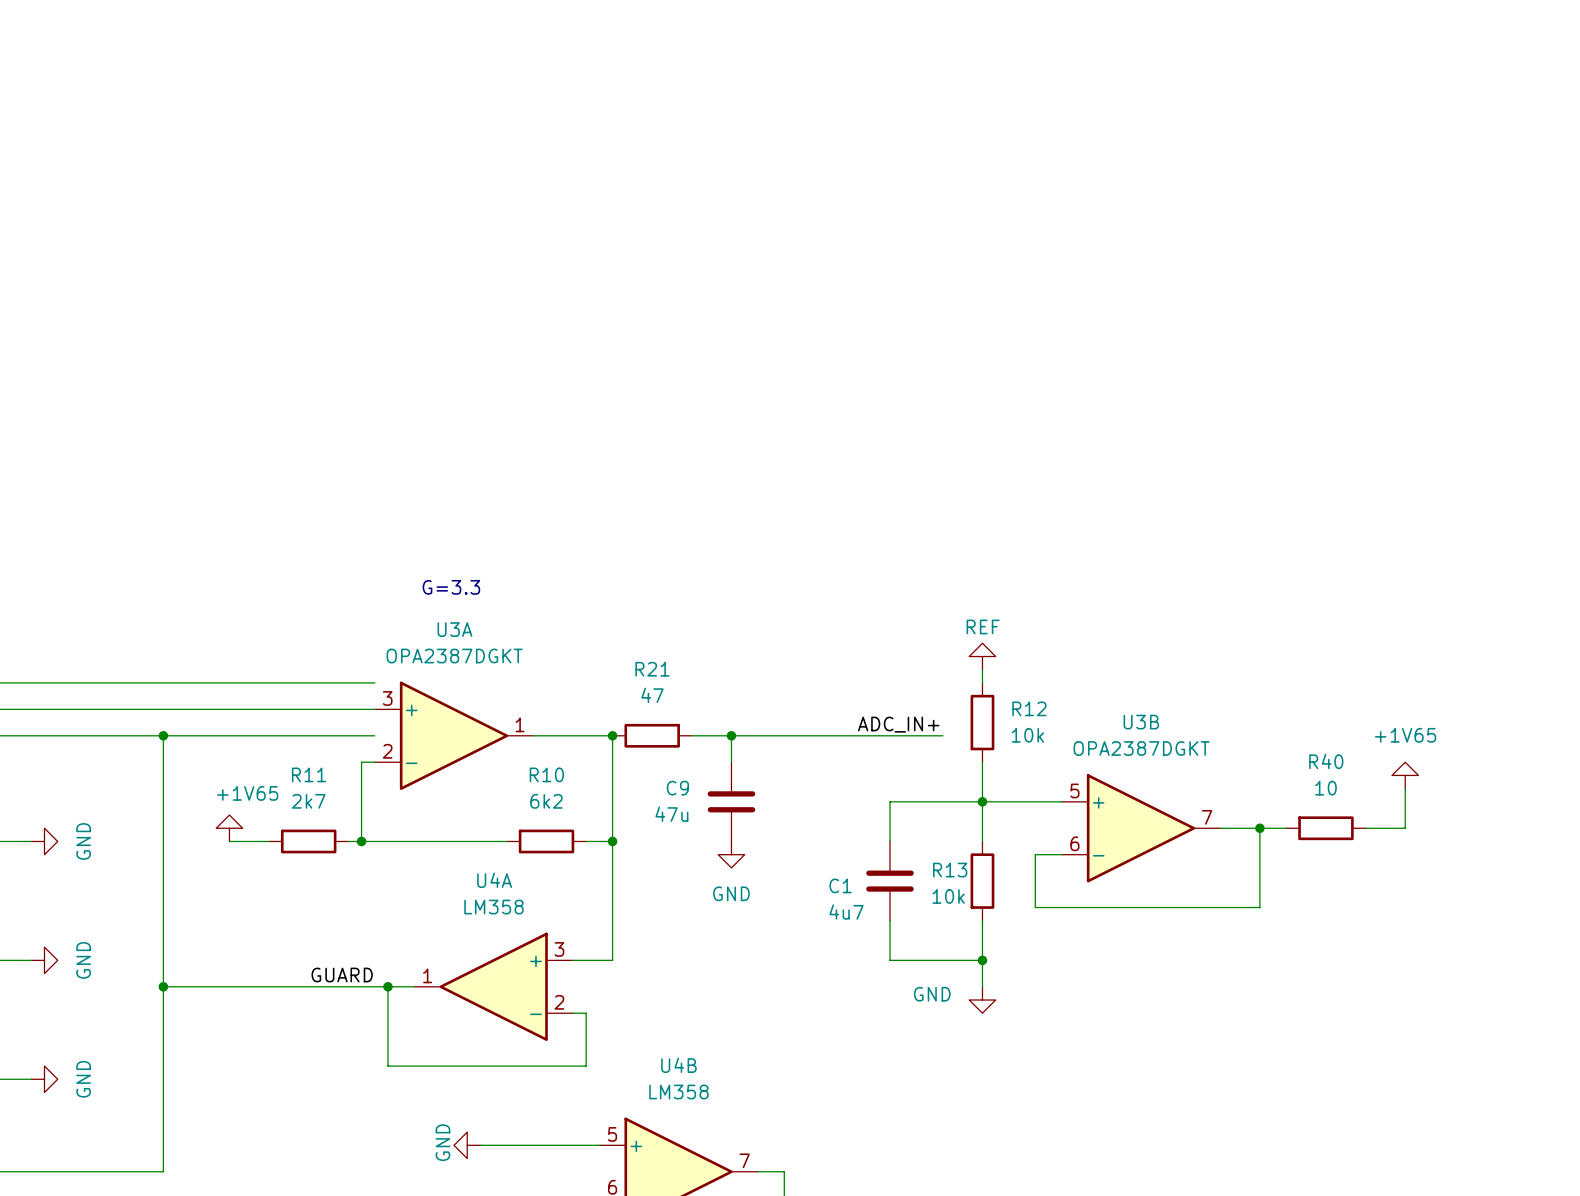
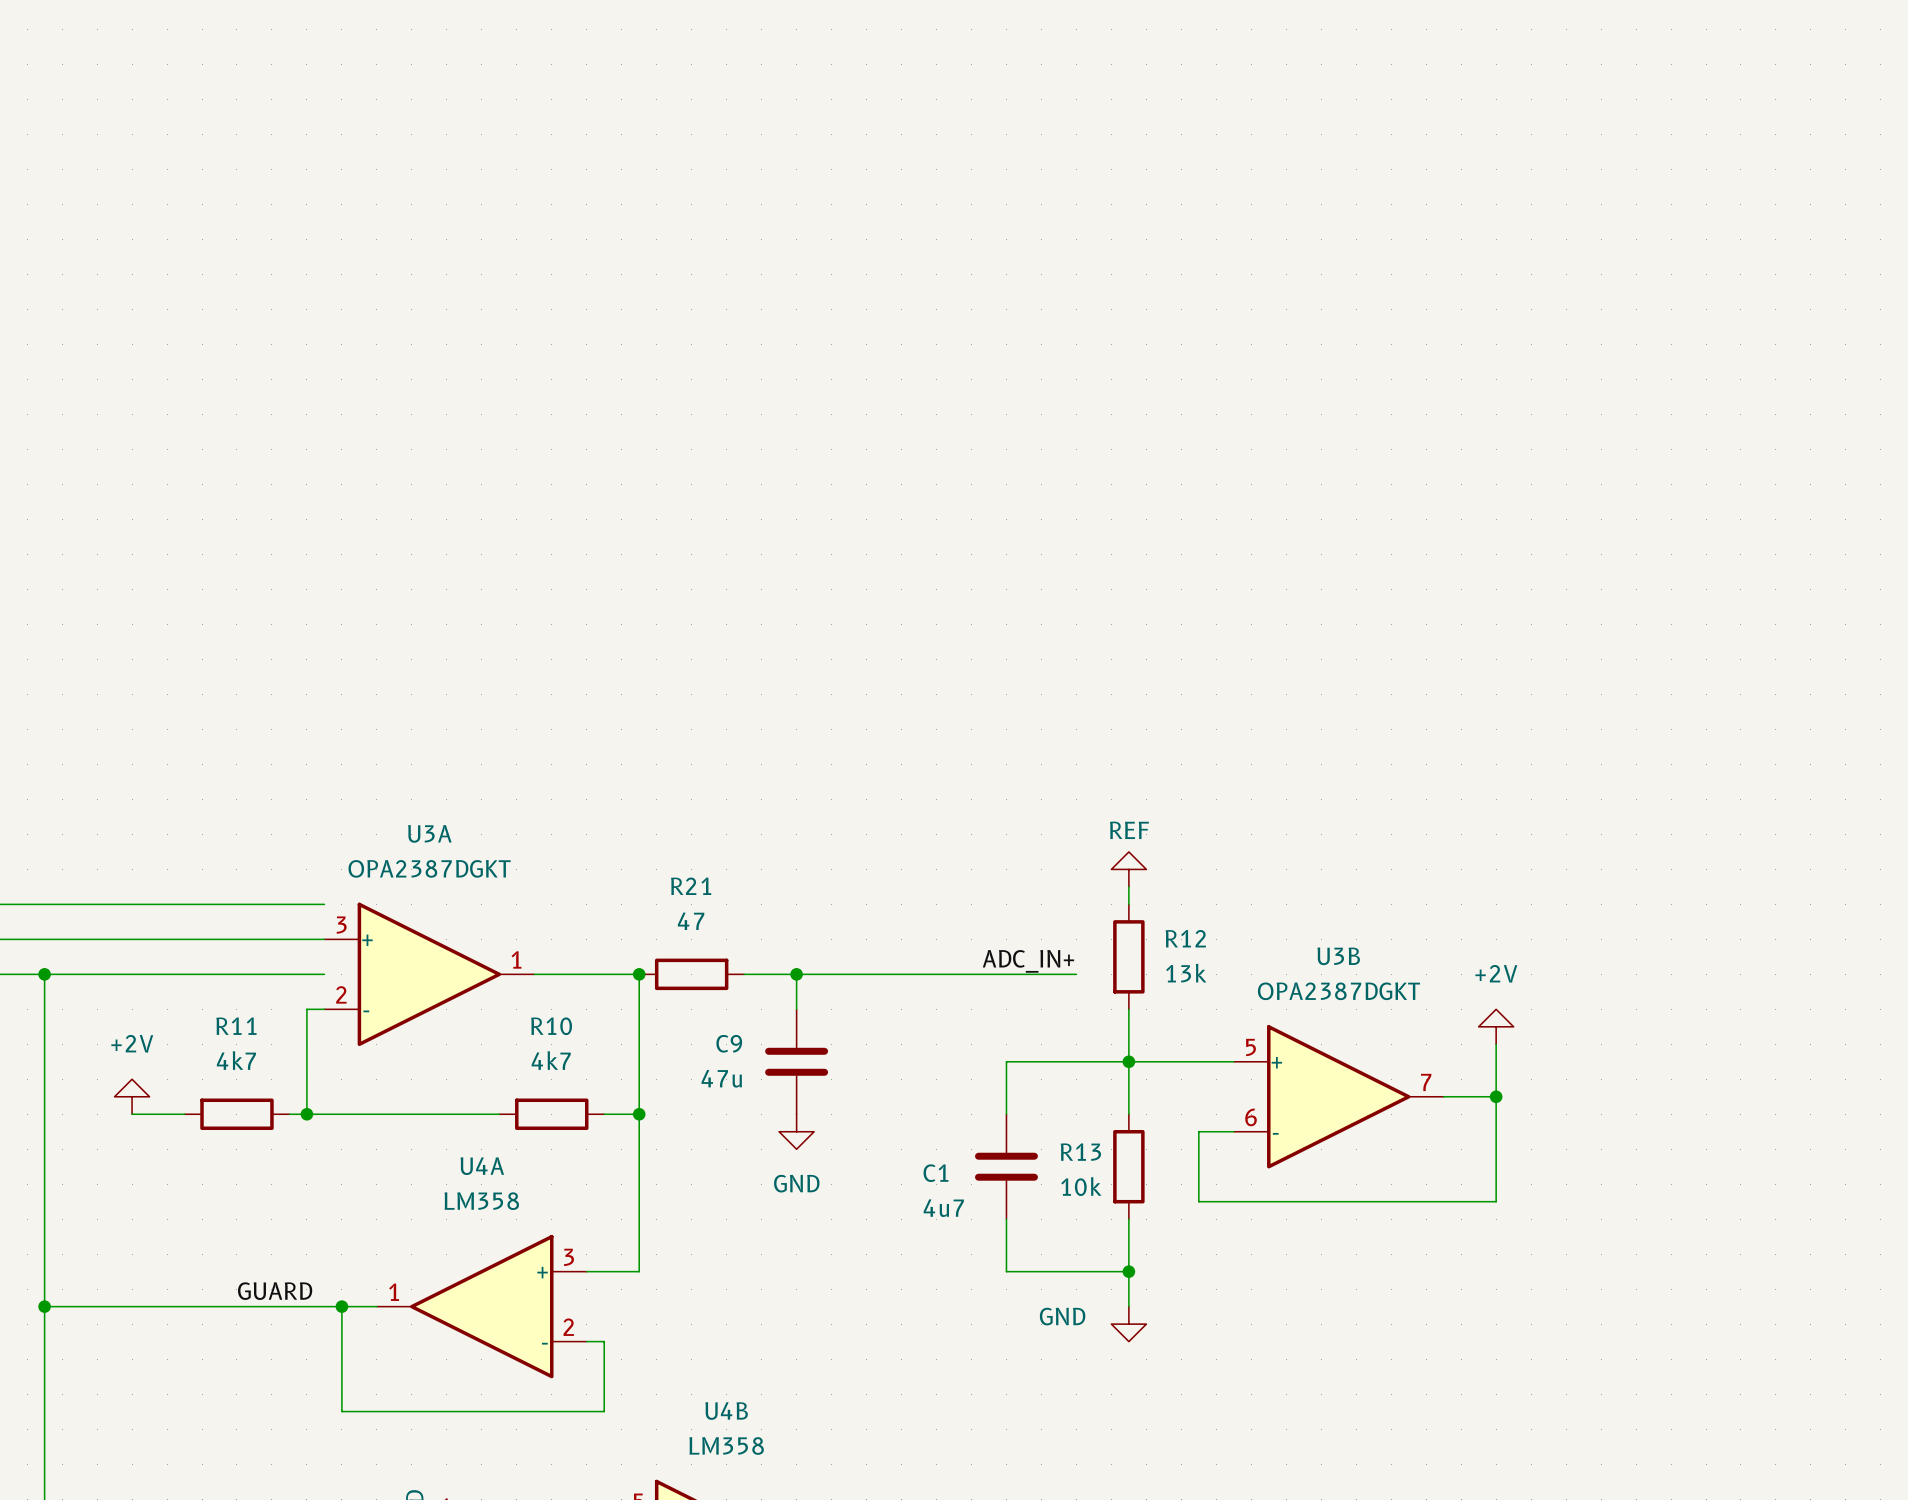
text: G=3.3 (451, 587) -> none
R12 value: 10k (1027, 735) -> 13k (1186, 973)
power symbol: none -> +2V (1496, 1026)
power symbol: +1V65 (1405, 775) -> none
wire: (1405, 788) (1405, 828) (1365, 828) -> none
R11 value: 2k7 (308, 801) -> 4k7 (236, 1060)
R10 value: 6k2 (546, 801) -> 4k7 (551, 1060)
power symbol: +1V65 (229, 828) -> +2V (132, 1096)
wire: (1259, 828) (1286, 828) -> (1496, 1096) (1496, 1044)
R40: 10 (1325, 828) -> none

